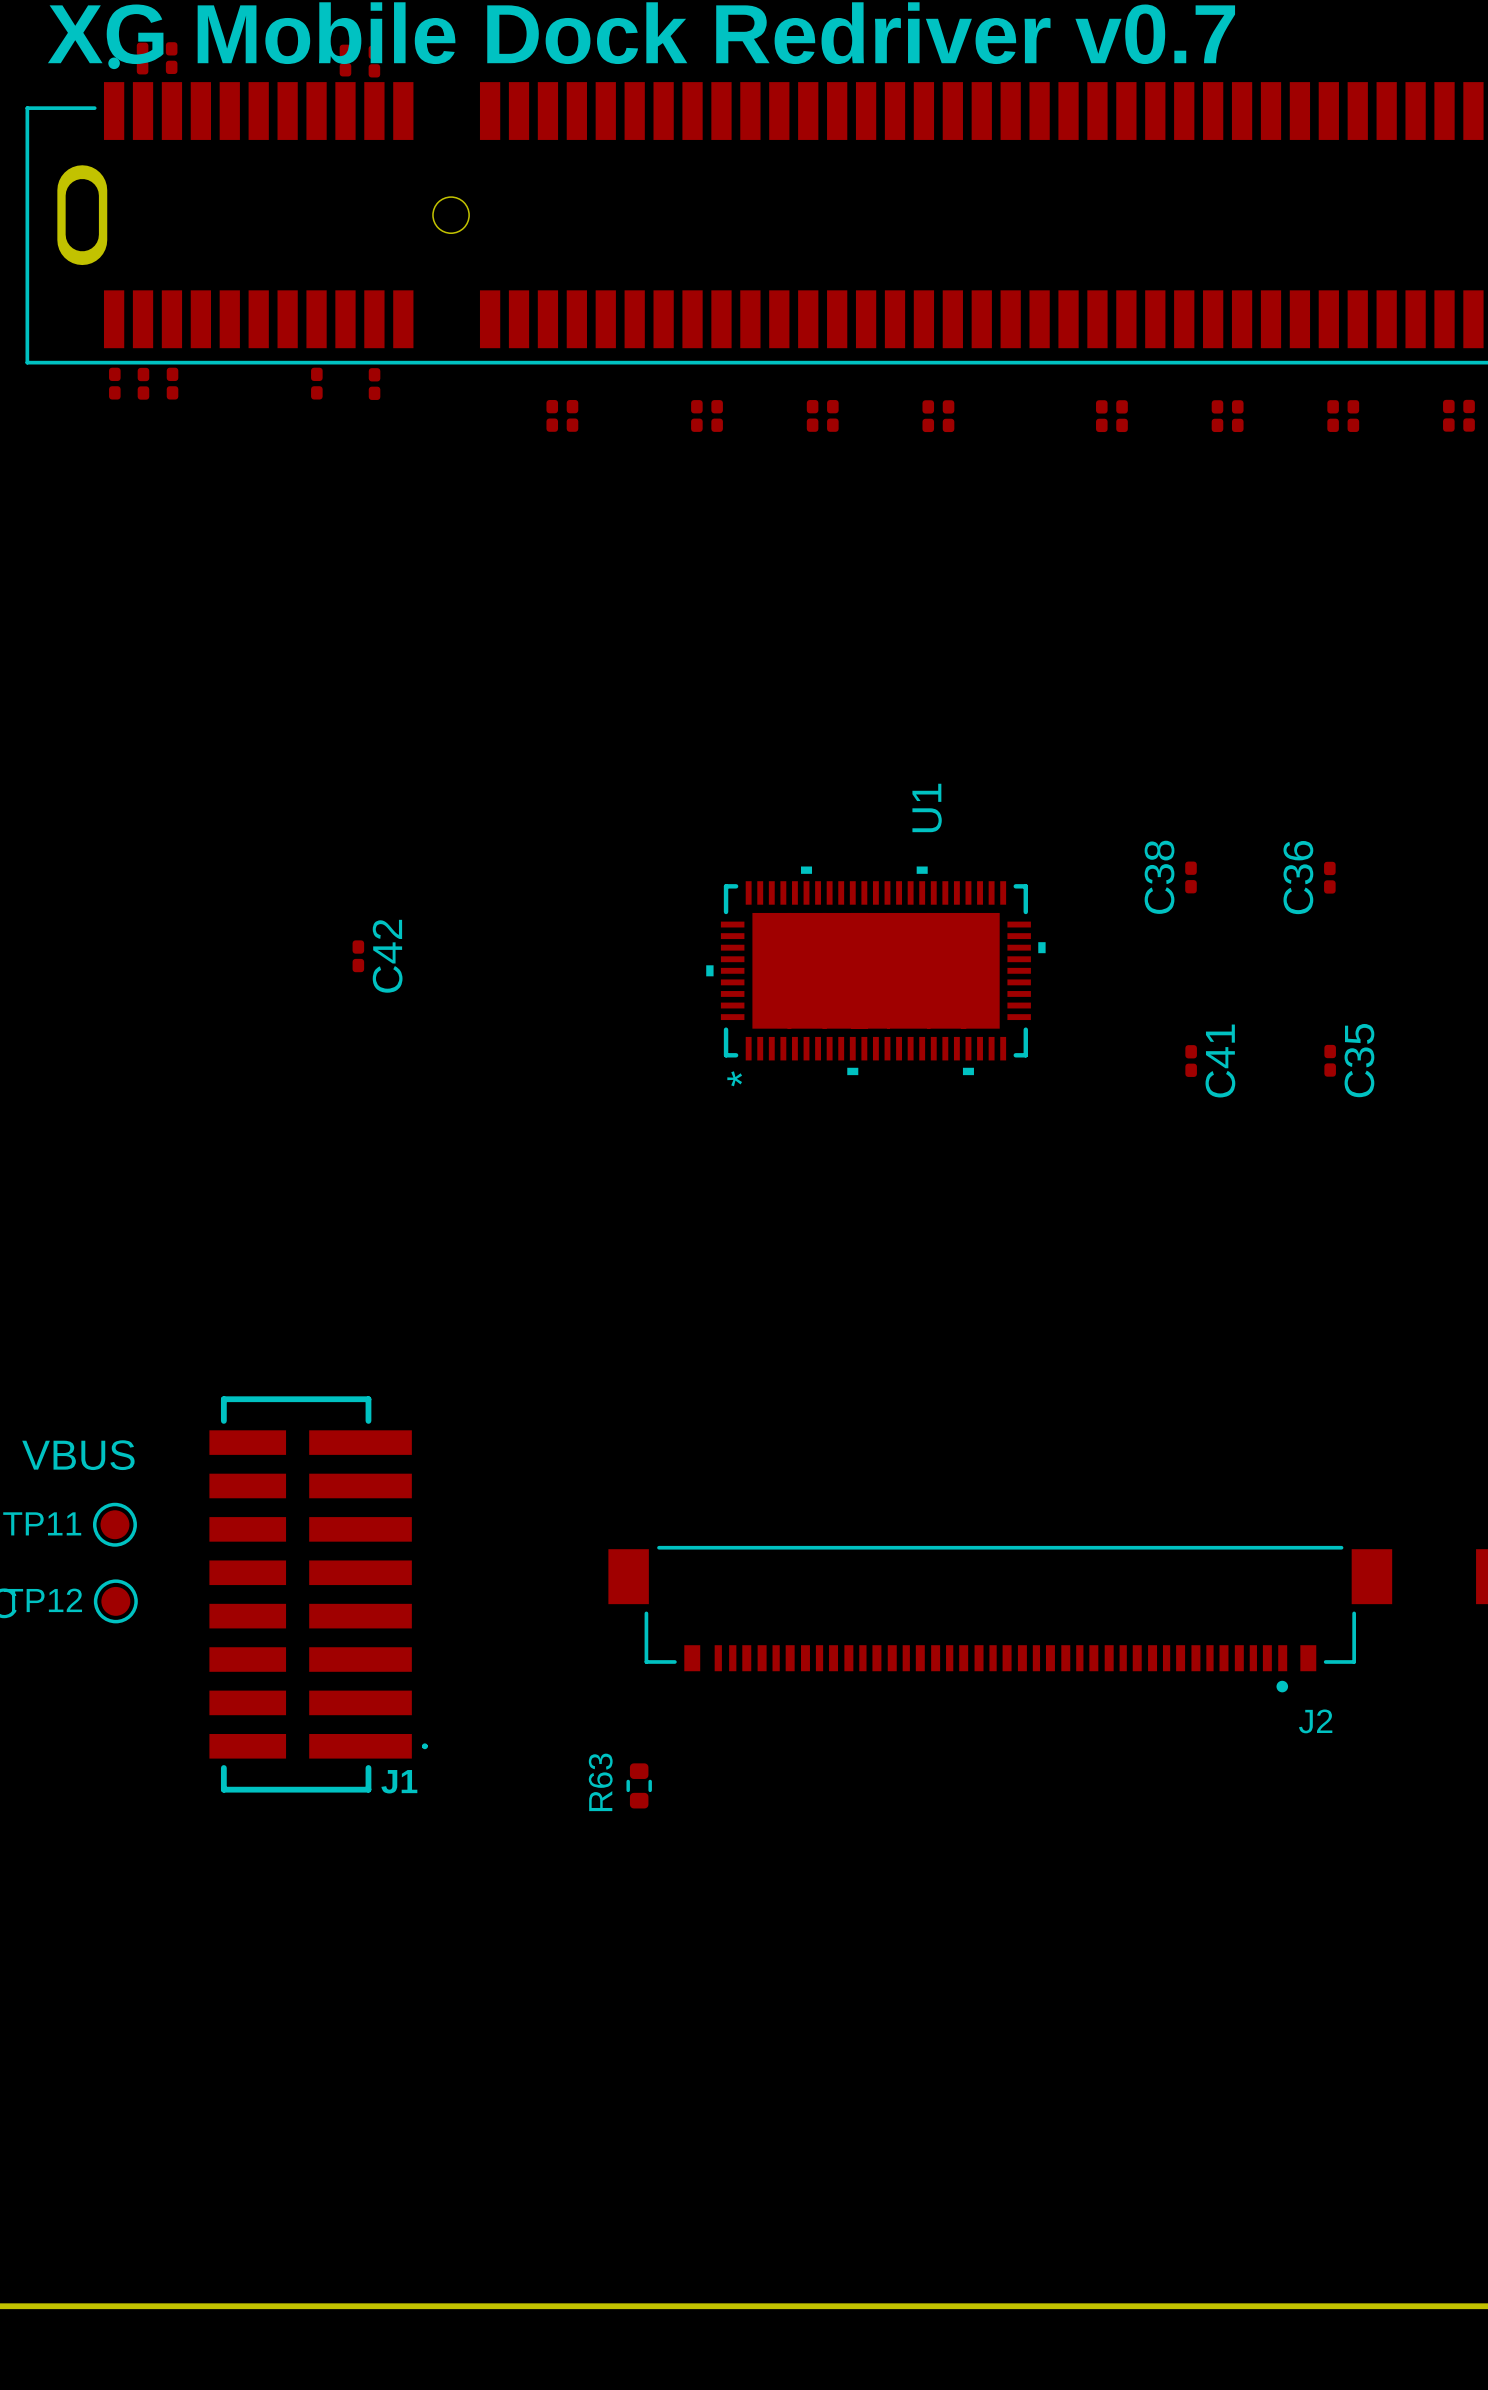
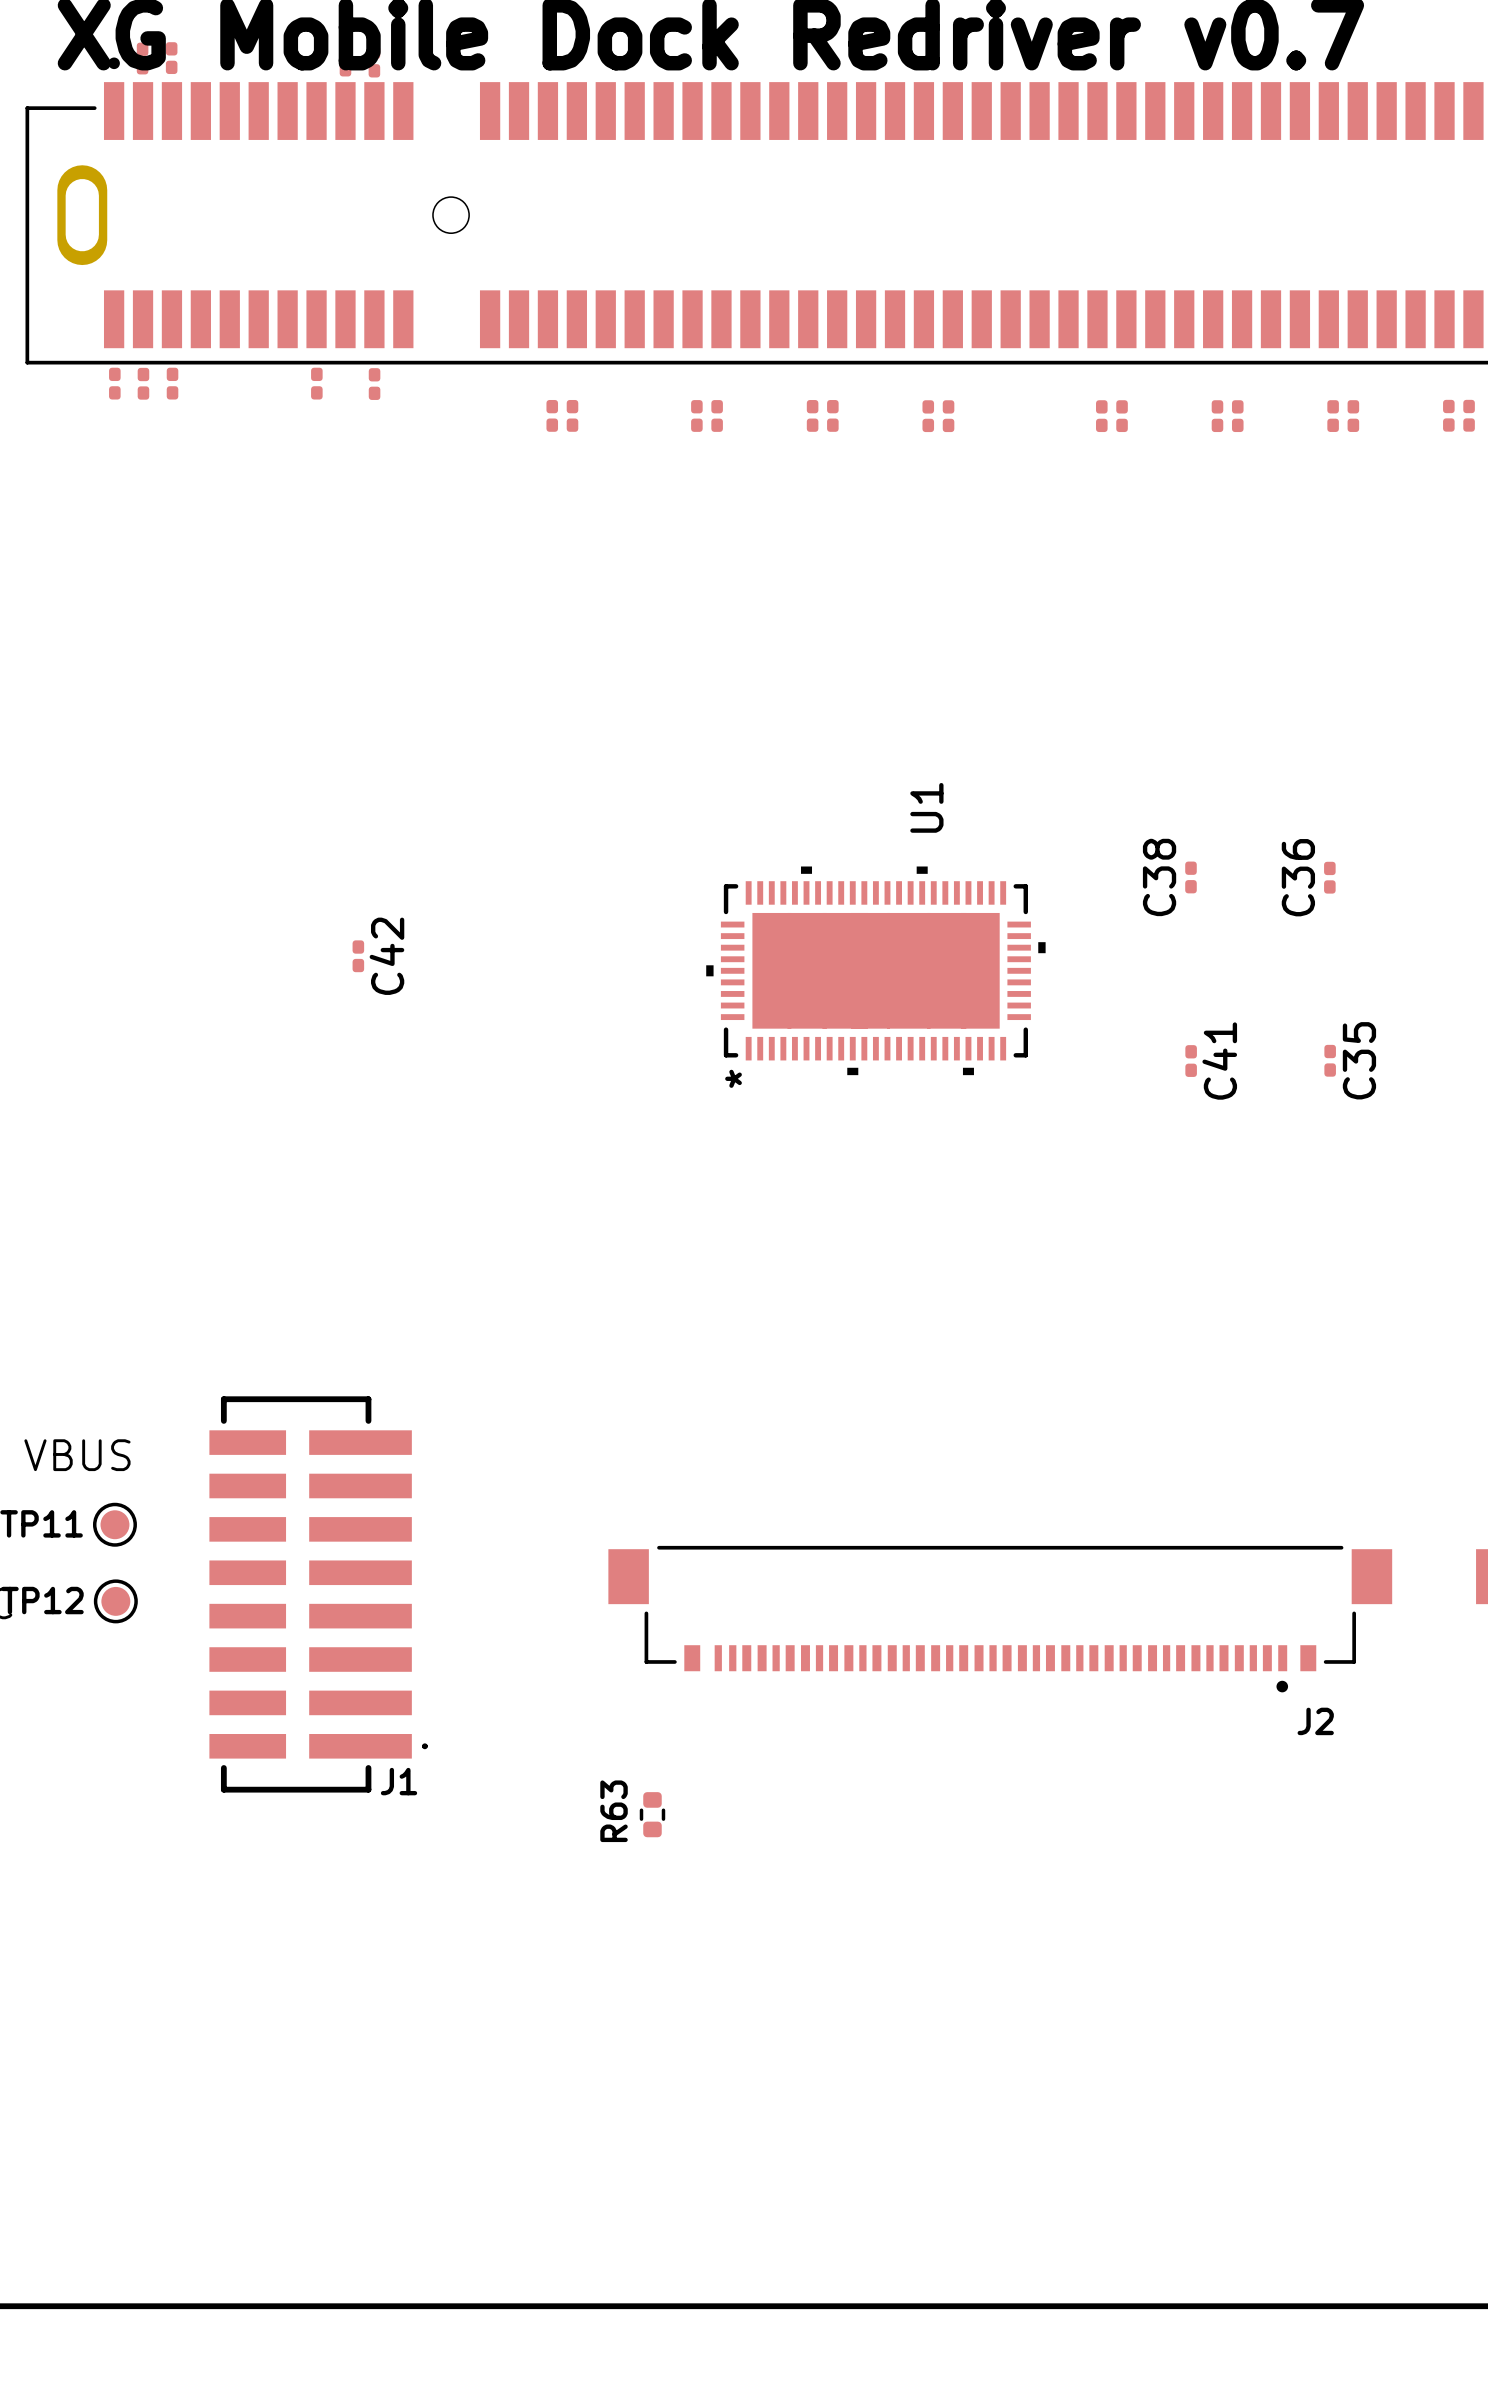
R63 position: (639, 1785) -> (652, 1814)

